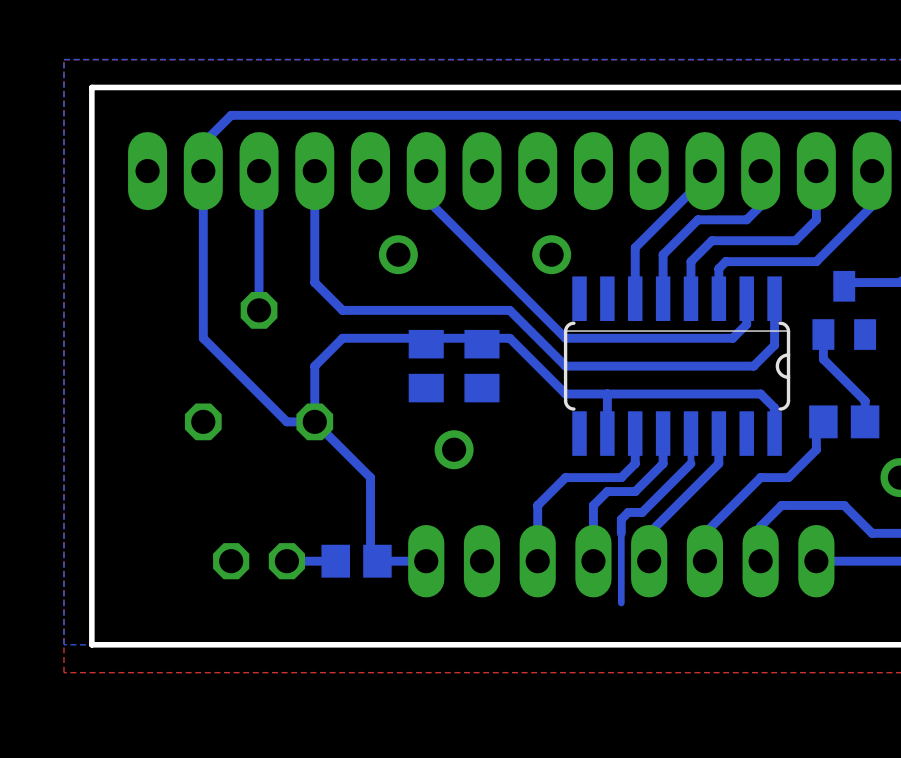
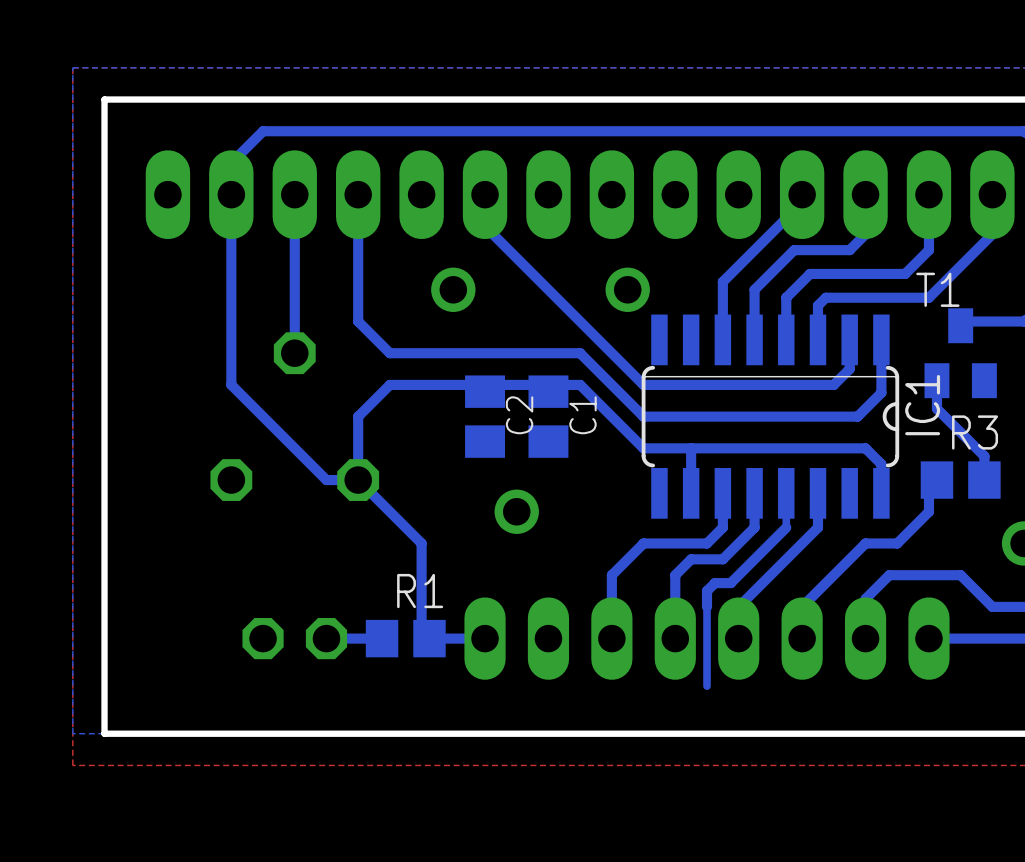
T1 name: none -> T1 (937, 289)
IC1 name: none -> IC1 (922, 405)
C2 name: none -> C2 (519, 415)
C1 name: none -> C1 (582, 415)
R3 name: none -> R3 (975, 432)
R1 name: none -> R1 (420, 591)

